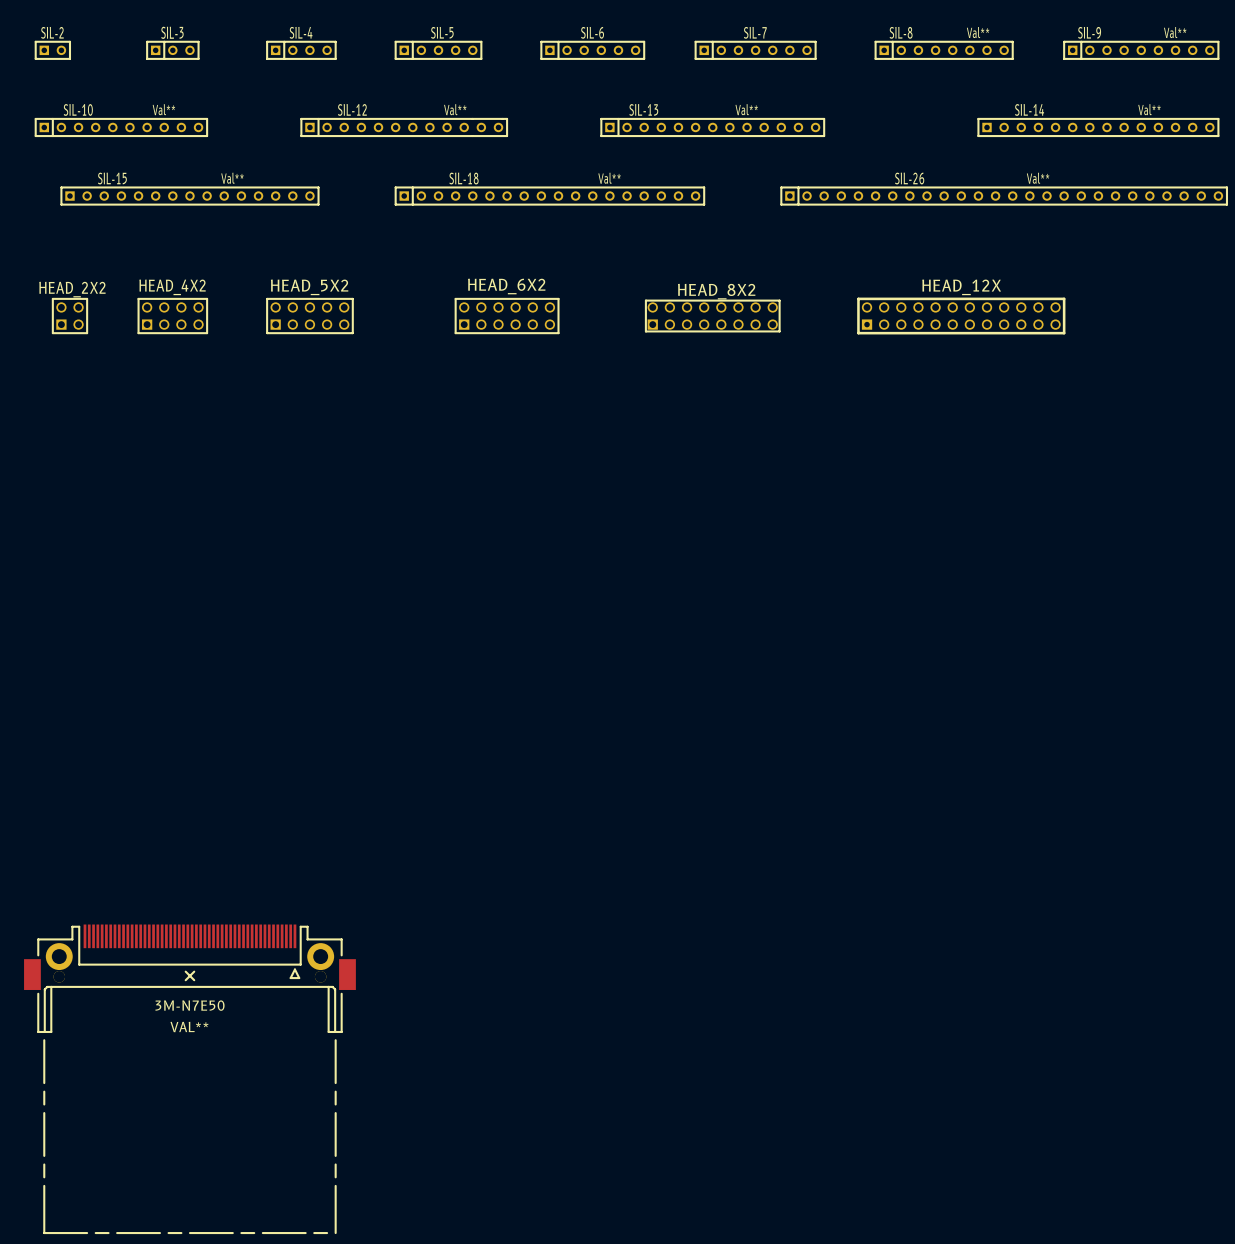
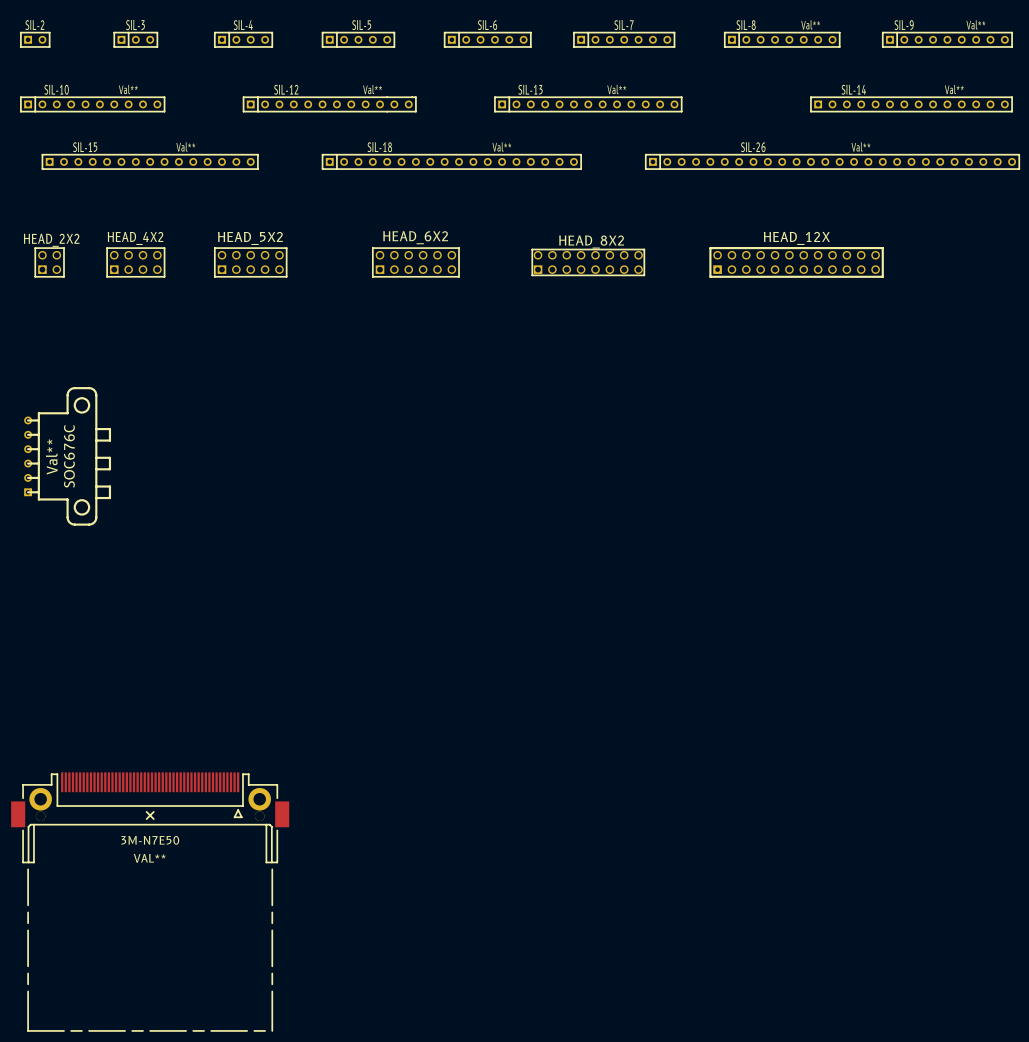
SOC676C: none -> Val** (67, 456)

